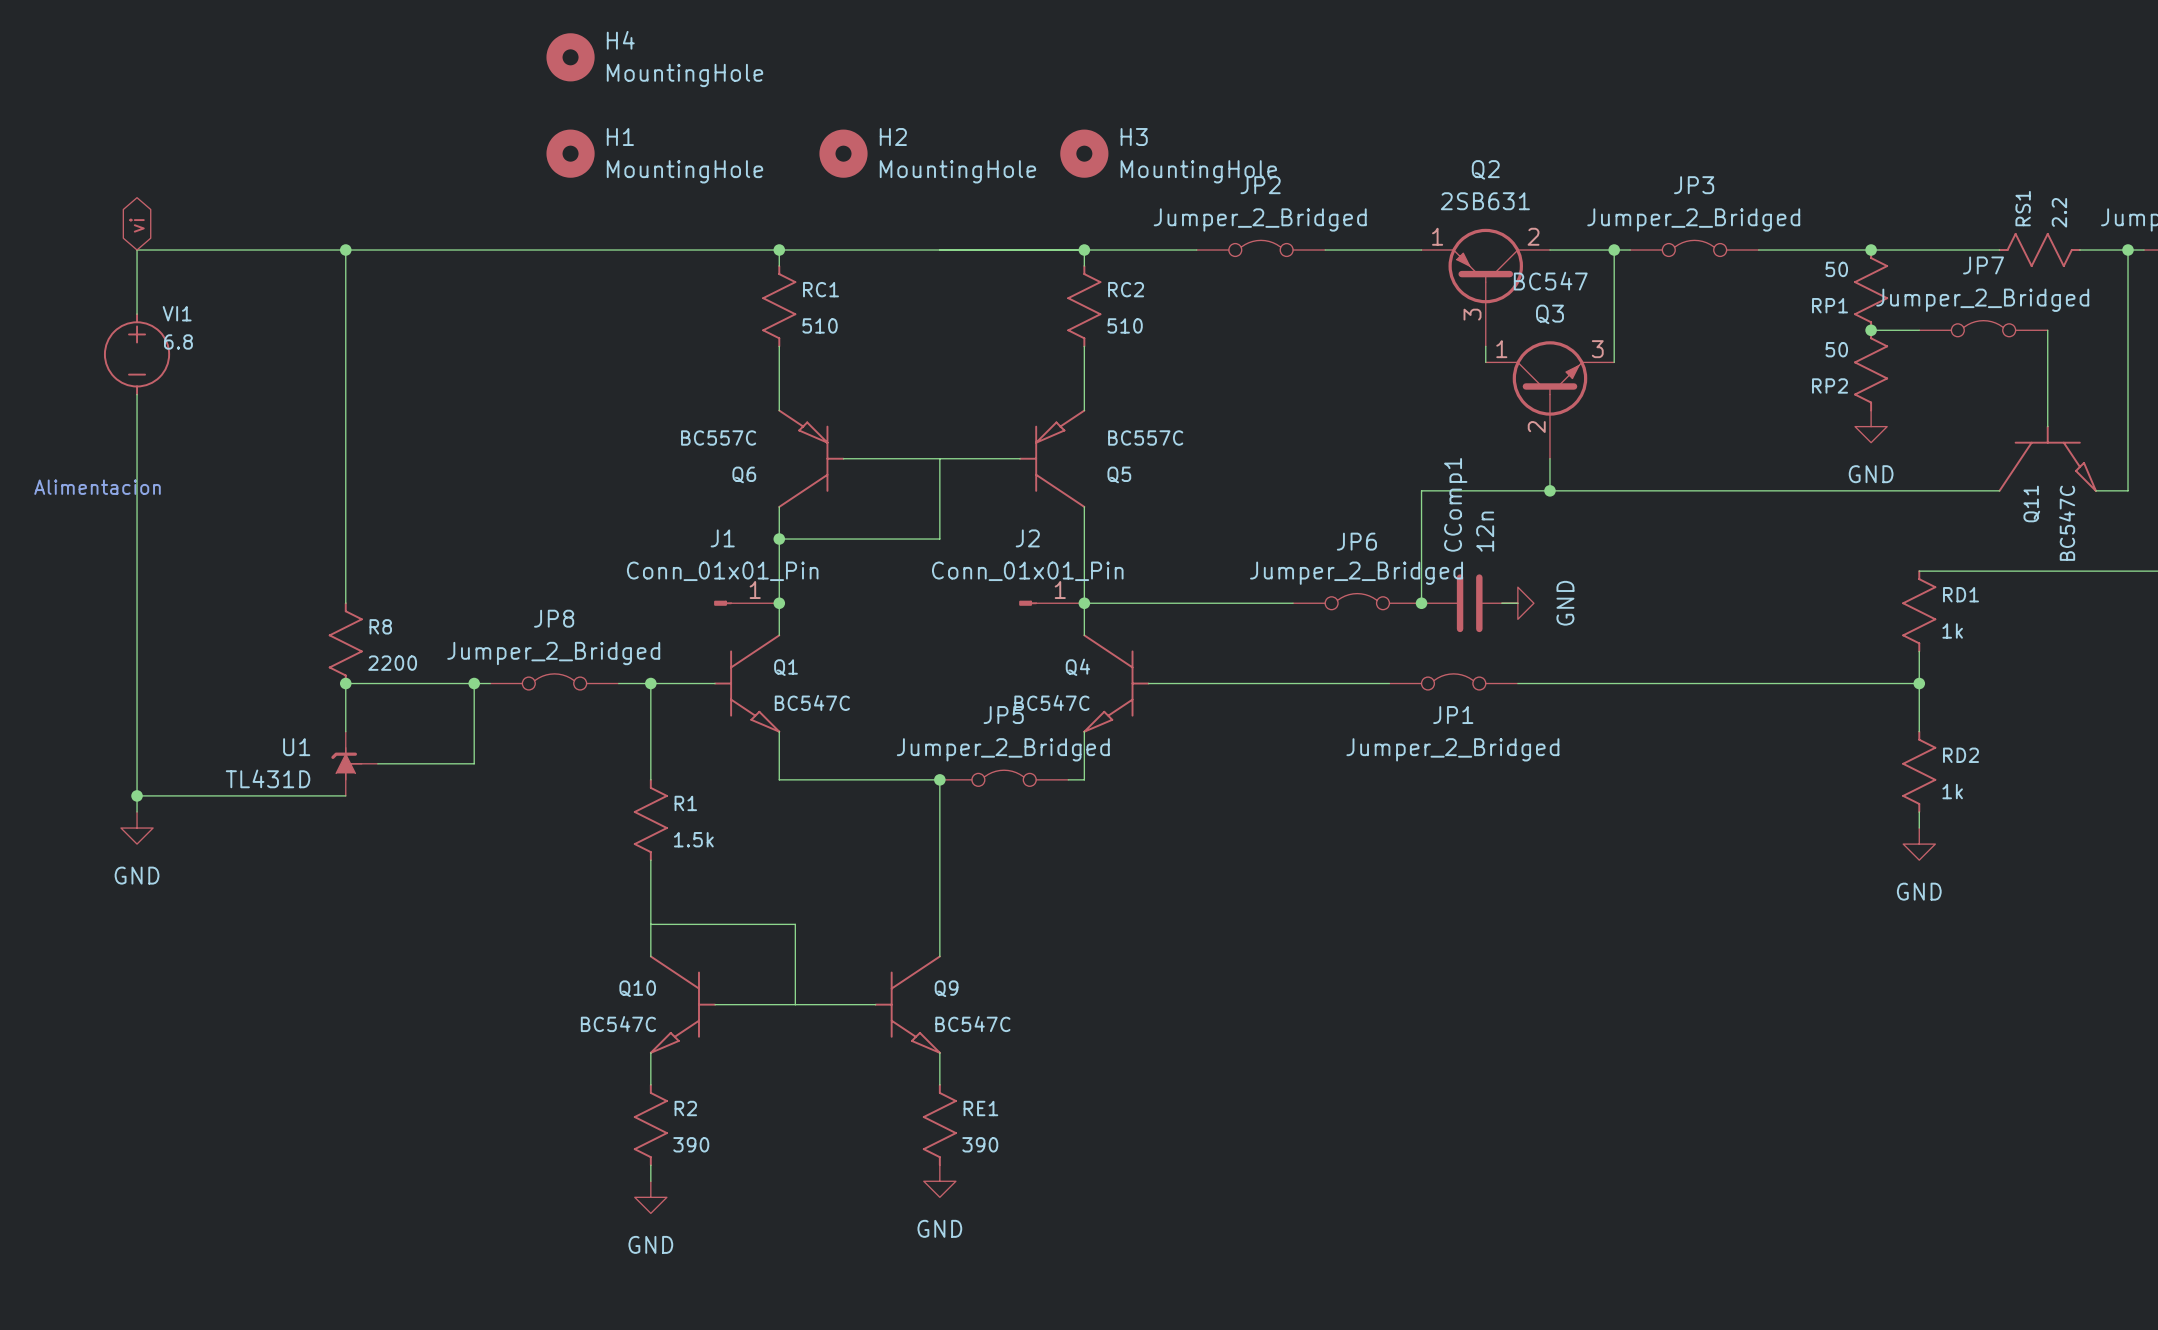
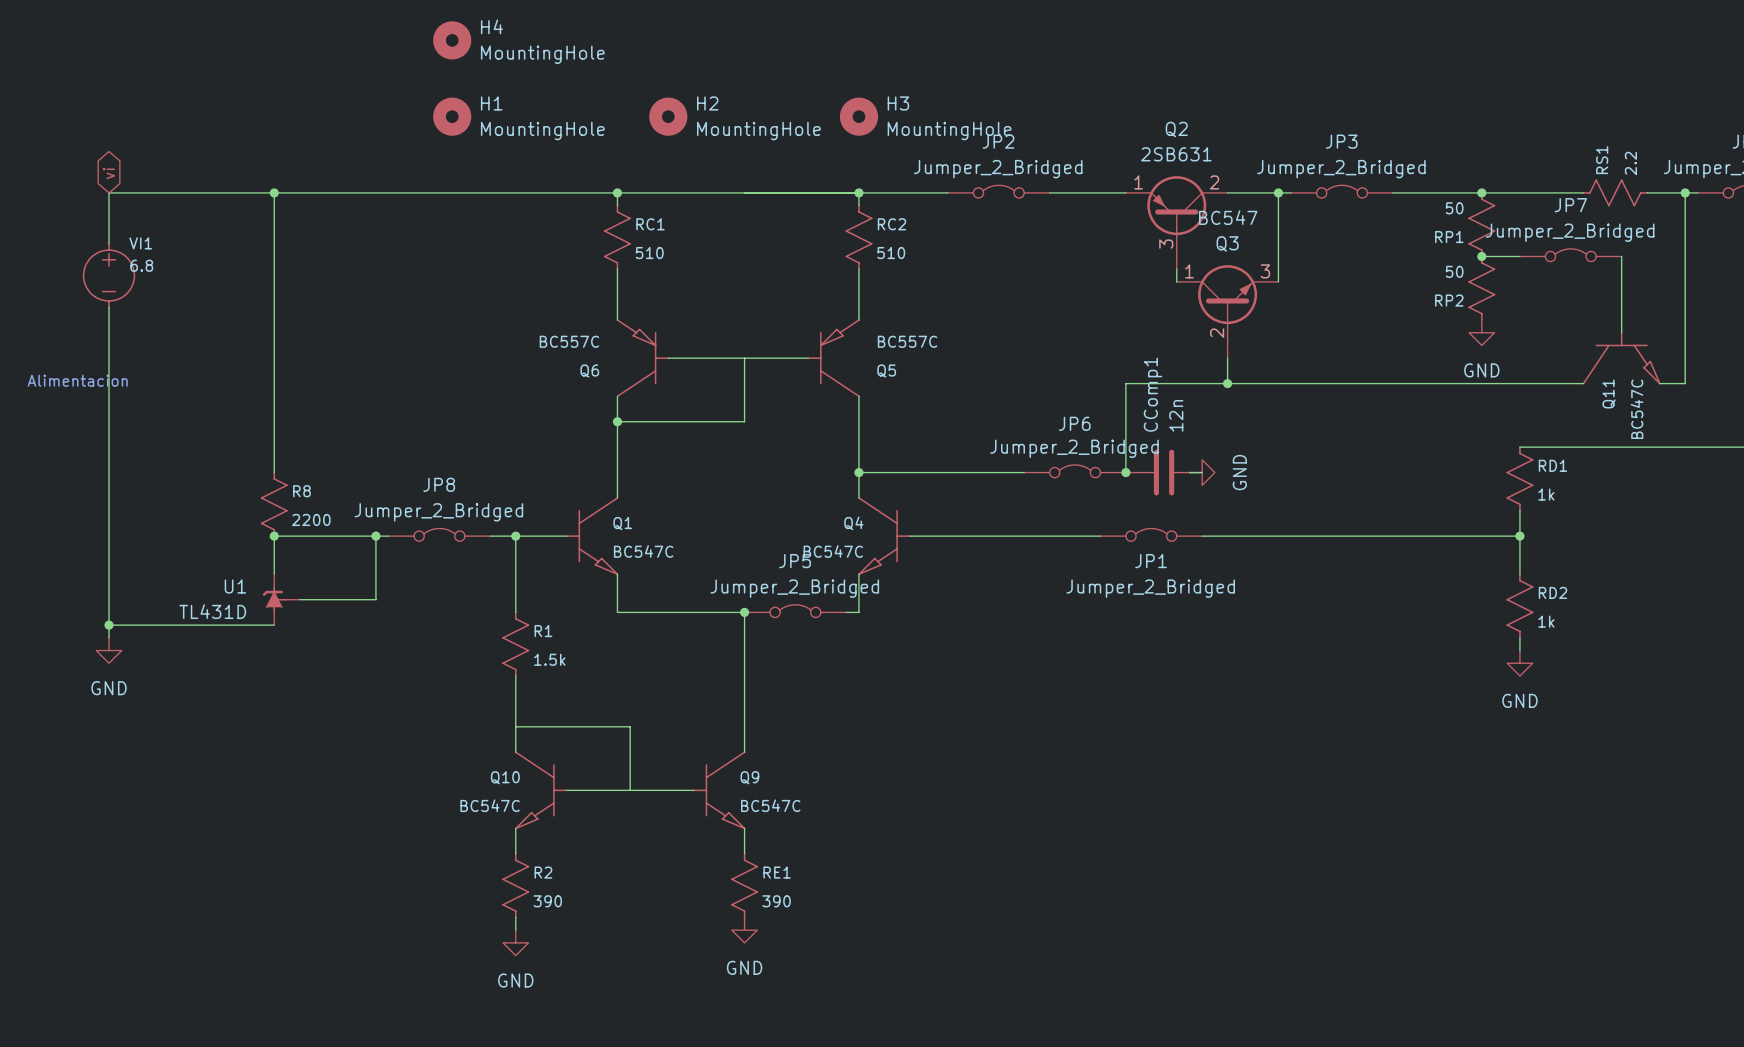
J1: Conn_01x01_Pin (746, 603) -> none
junction: (779, 603) -> none
J2: Conn_01x01_Pin (1051, 603) -> none

